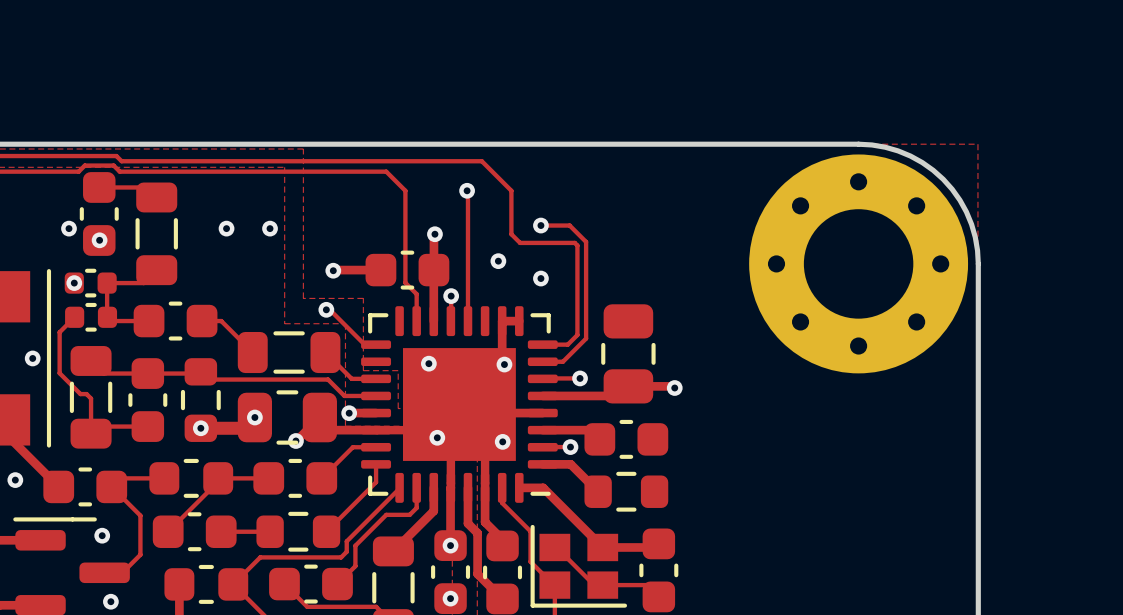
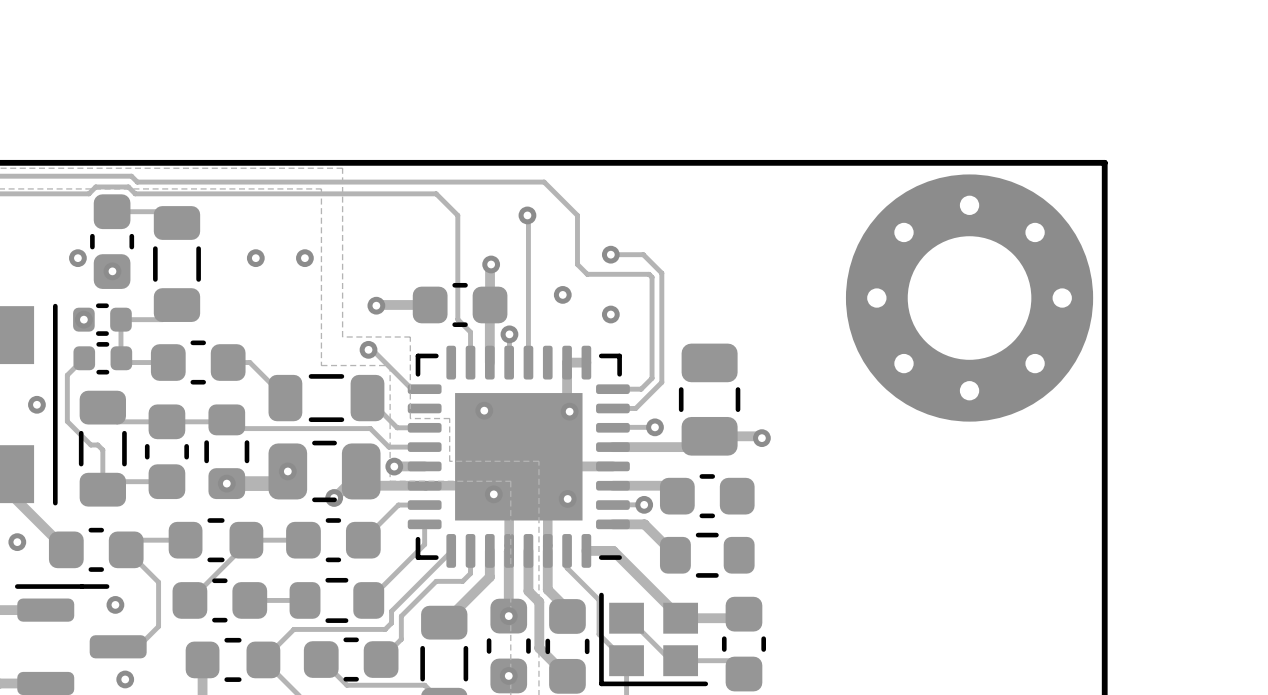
board edge: (858, 144) (872, 144) (898, 150) (922, 162) (943, 179) (959, 200) (971, 224) (977, 250) (978, 263) -> (969, 162) (1104, 162) (1104, 298)

